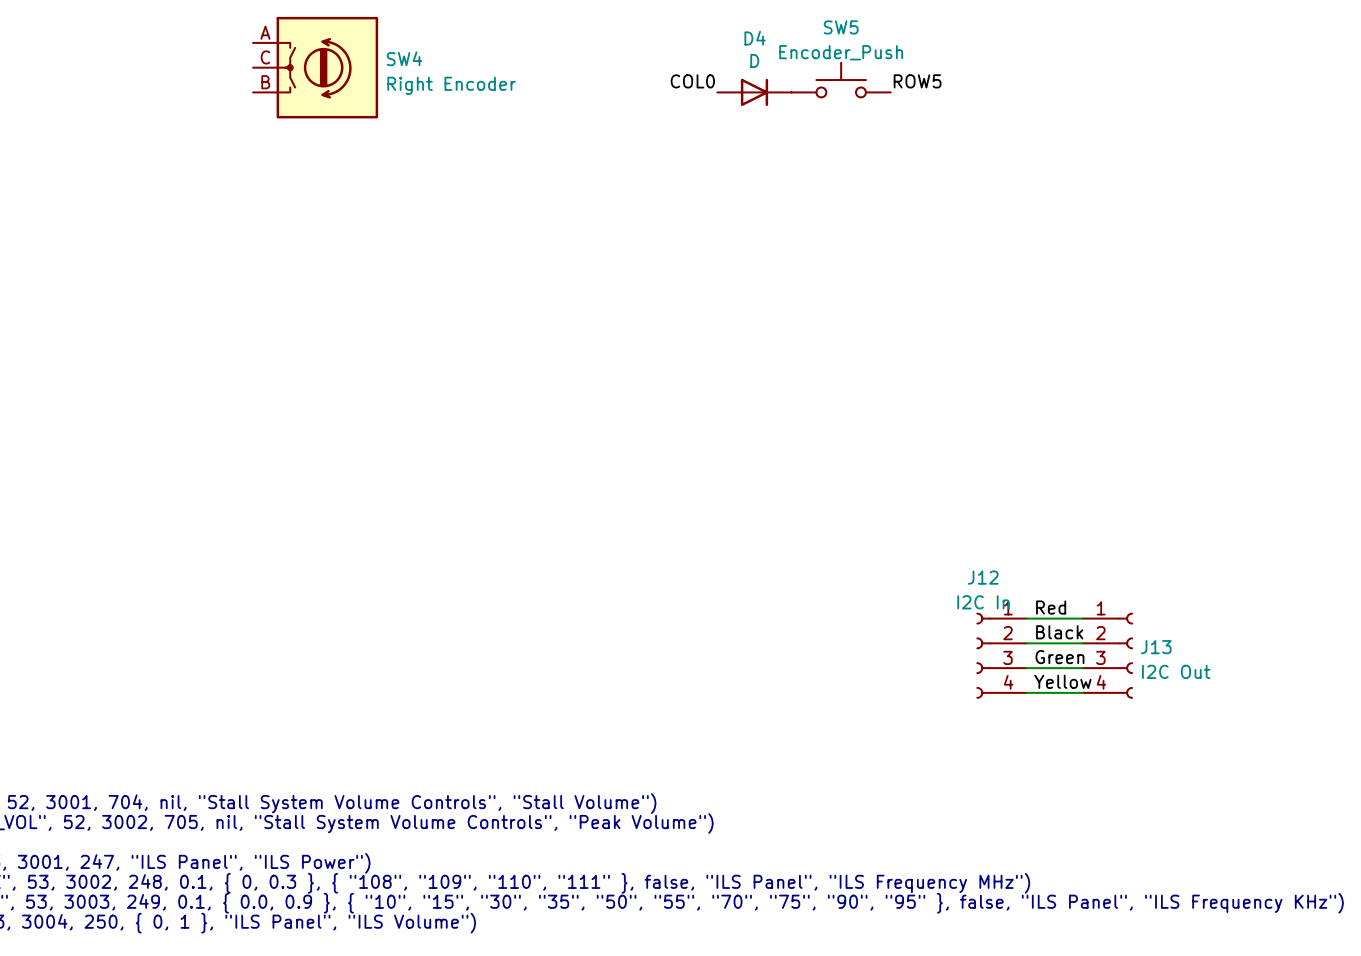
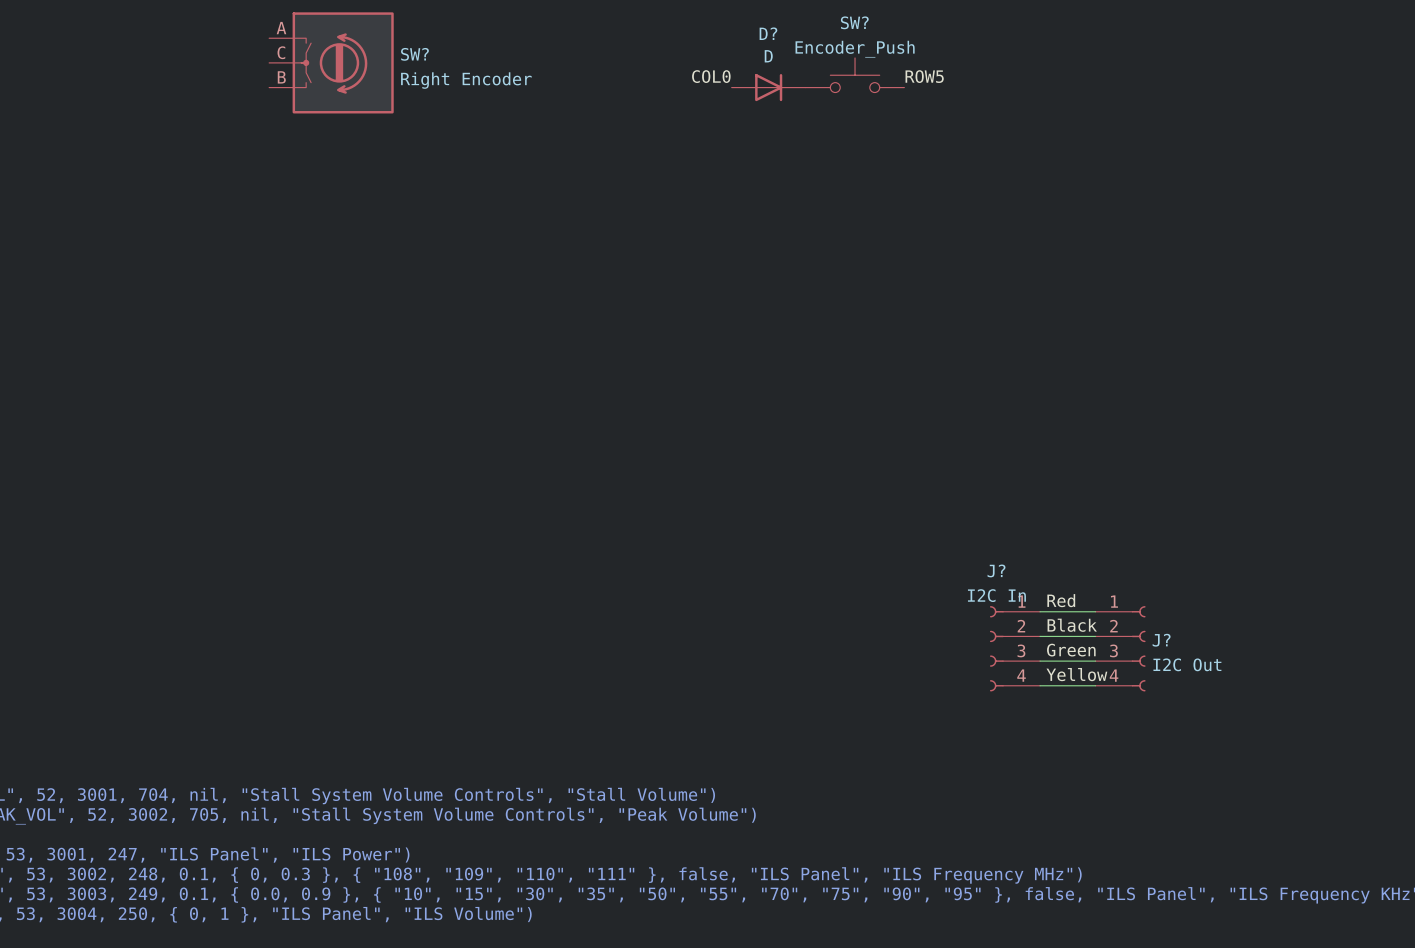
SW5 name: SW5 (841, 27) -> SW? (854, 22)
D4 name: D4 (755, 38) -> D? (768, 33)
SW4 name: SW4 (404, 58) -> SW? (414, 54)
J12 name: J12 (983, 577) -> J? (996, 570)
J13 name: J13 (1156, 647) -> J? (1161, 640)

